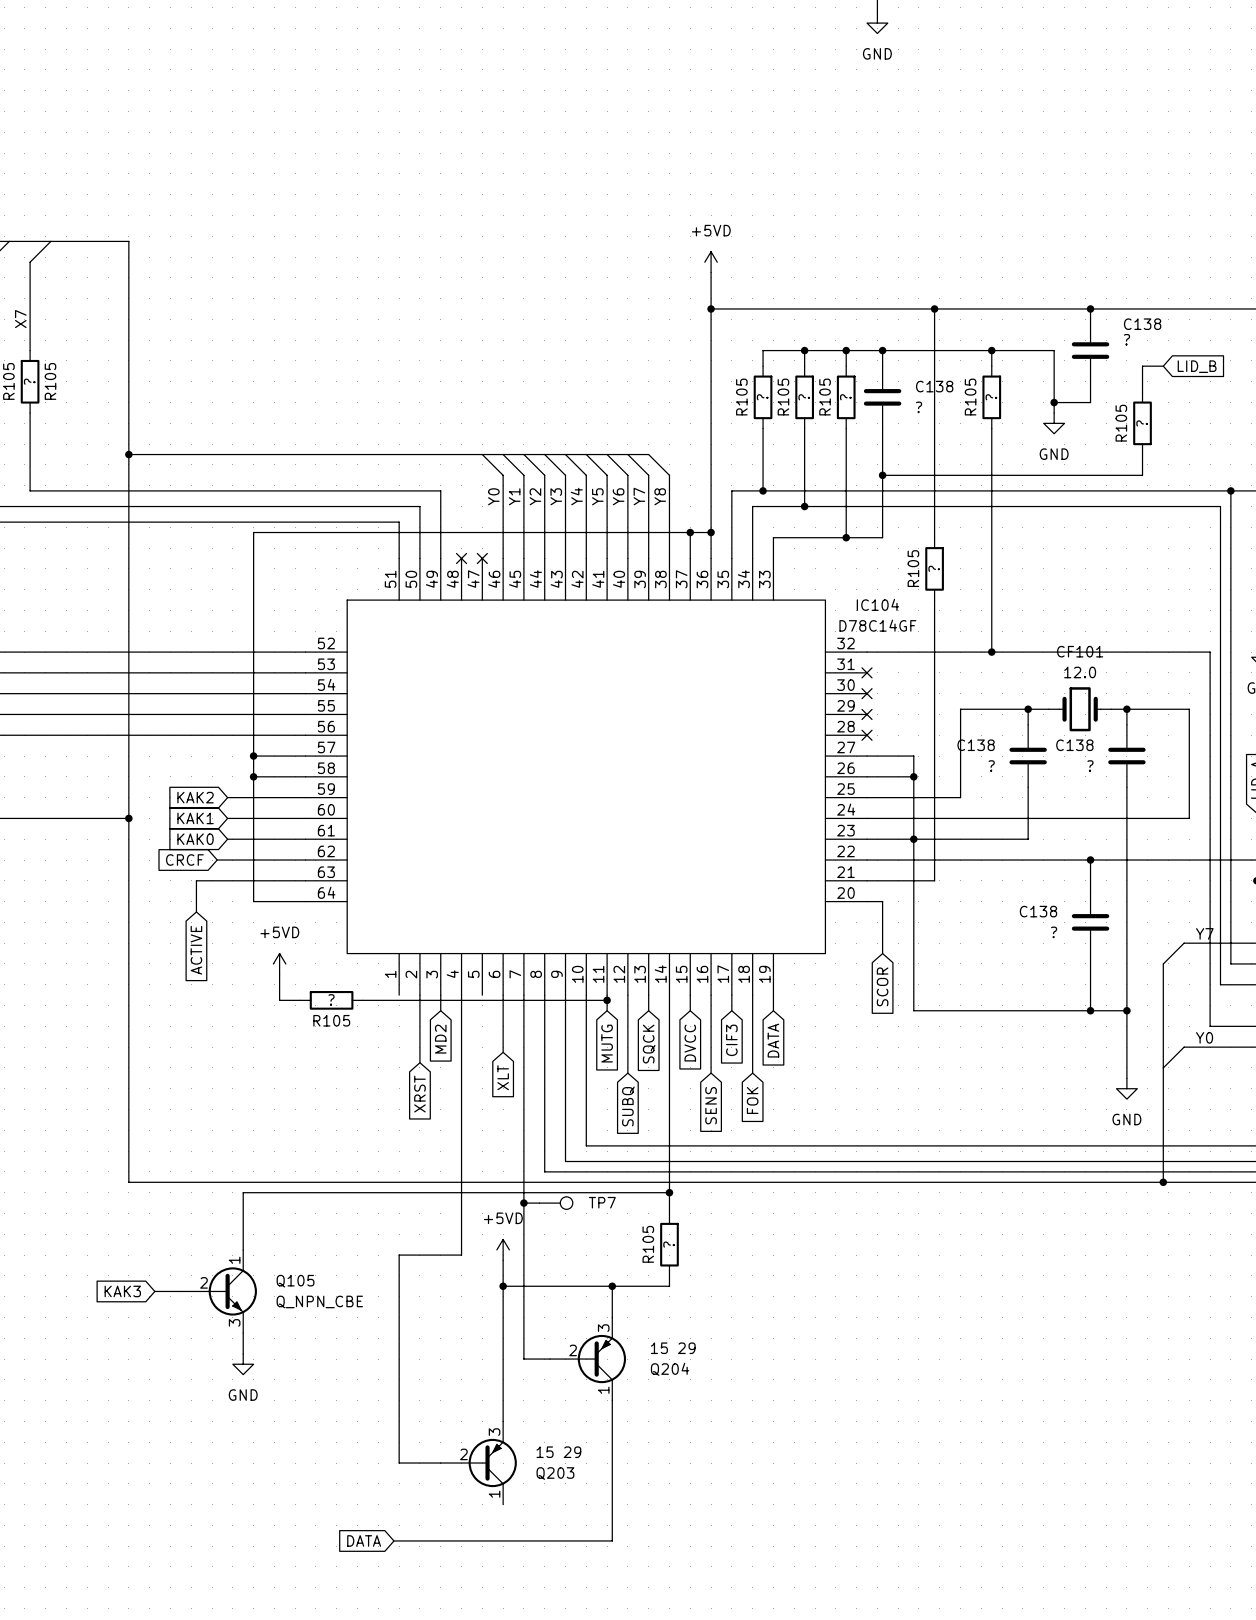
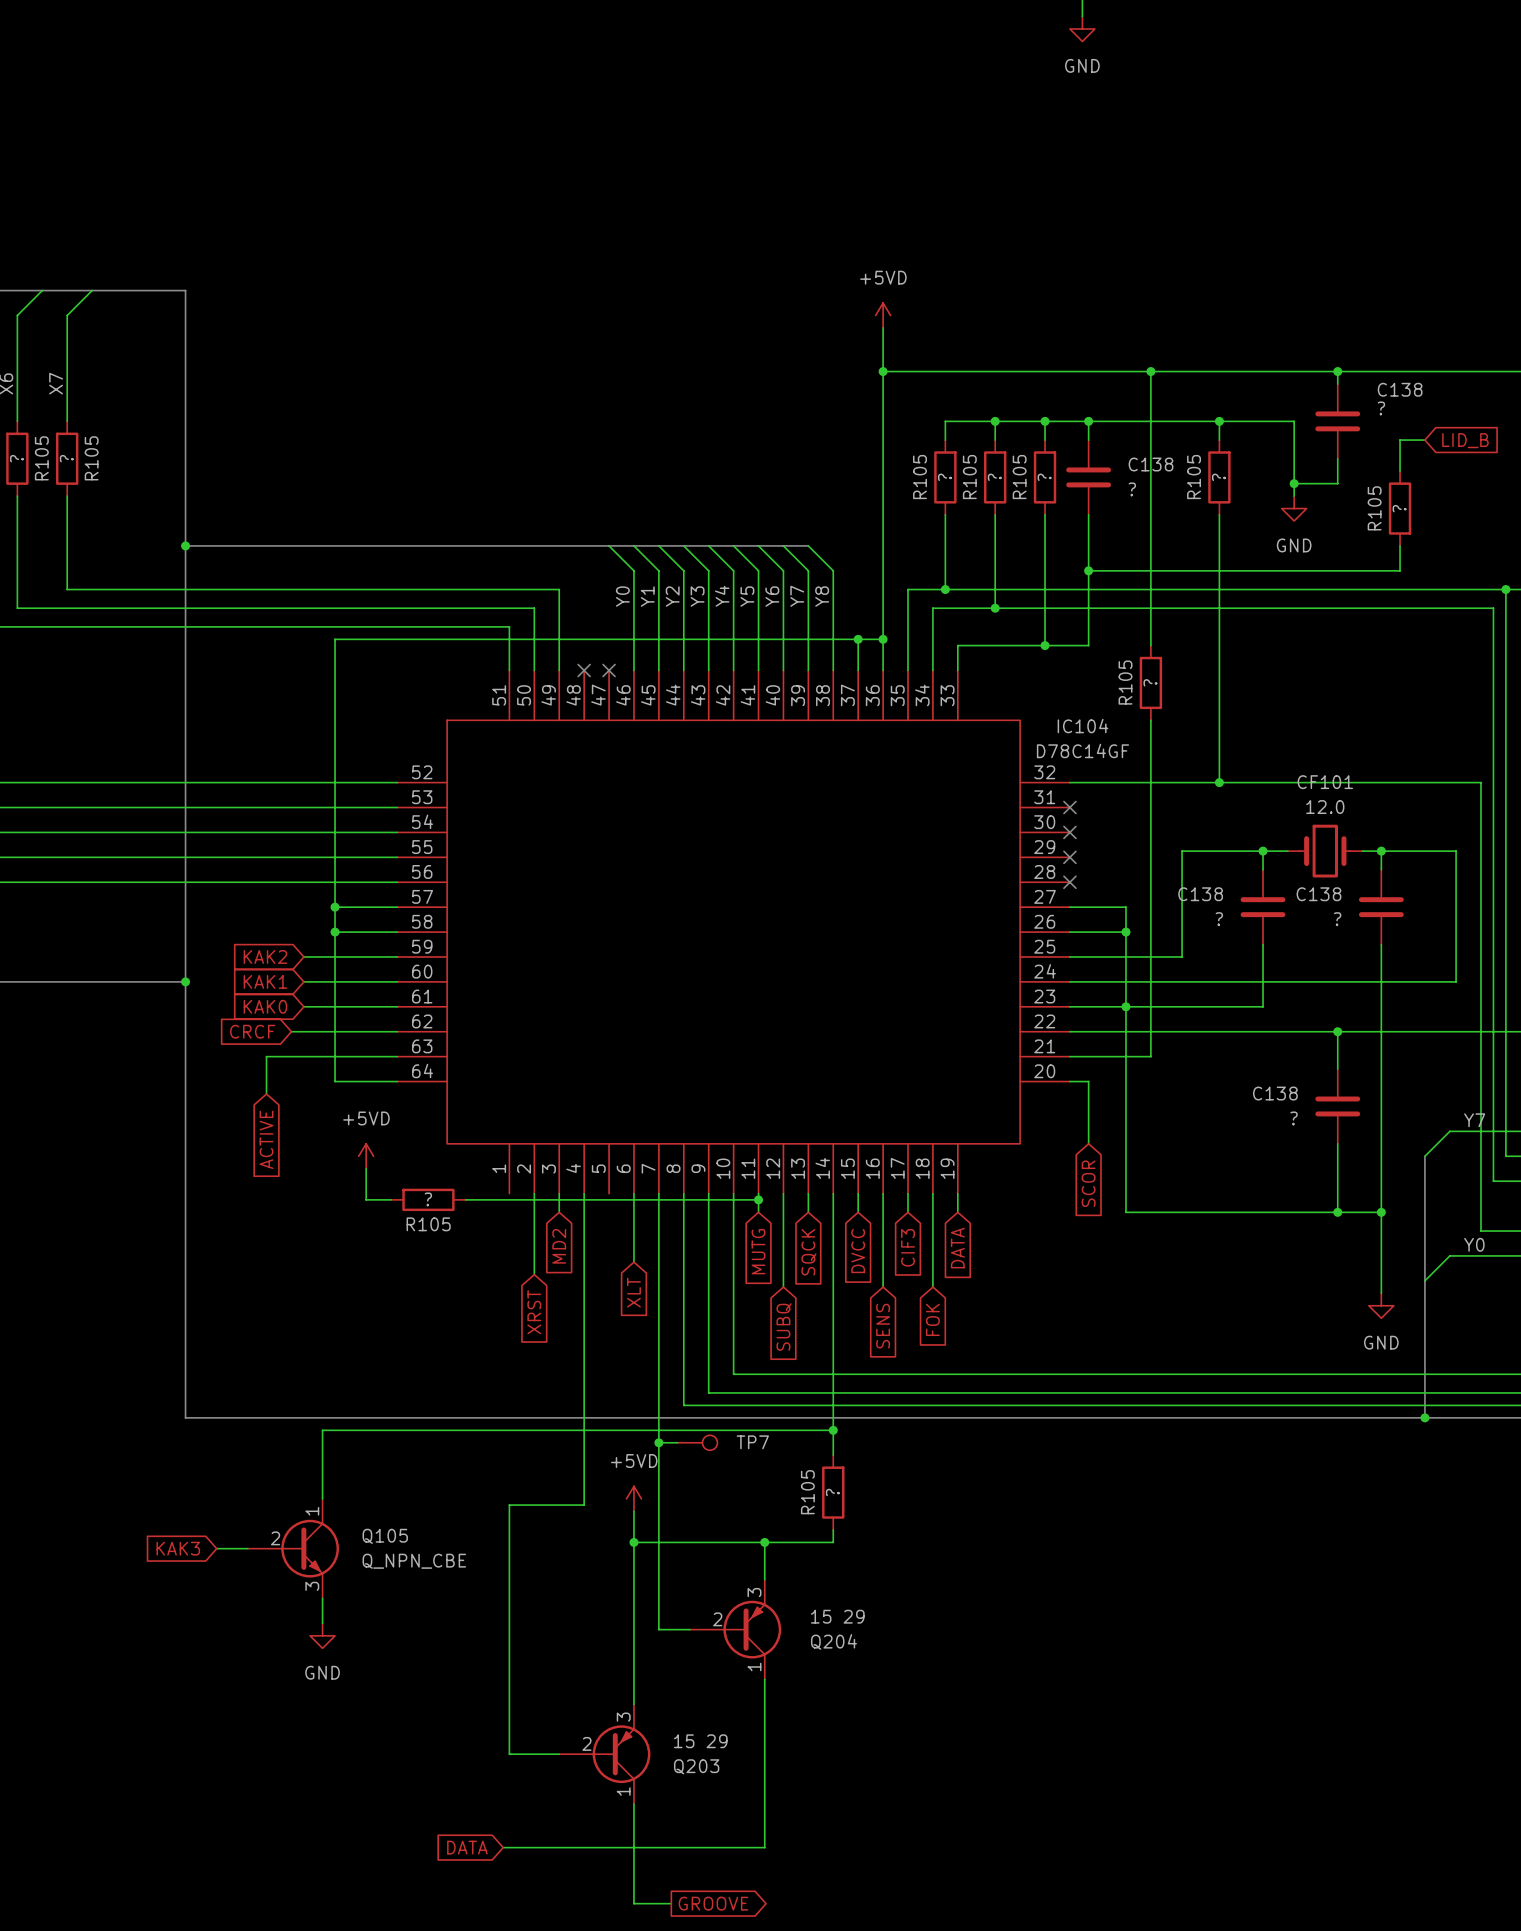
wire: none -> (633, 1804) (633, 1903) (671, 1903)
global label: none -> GROOVE (713, 1903)

